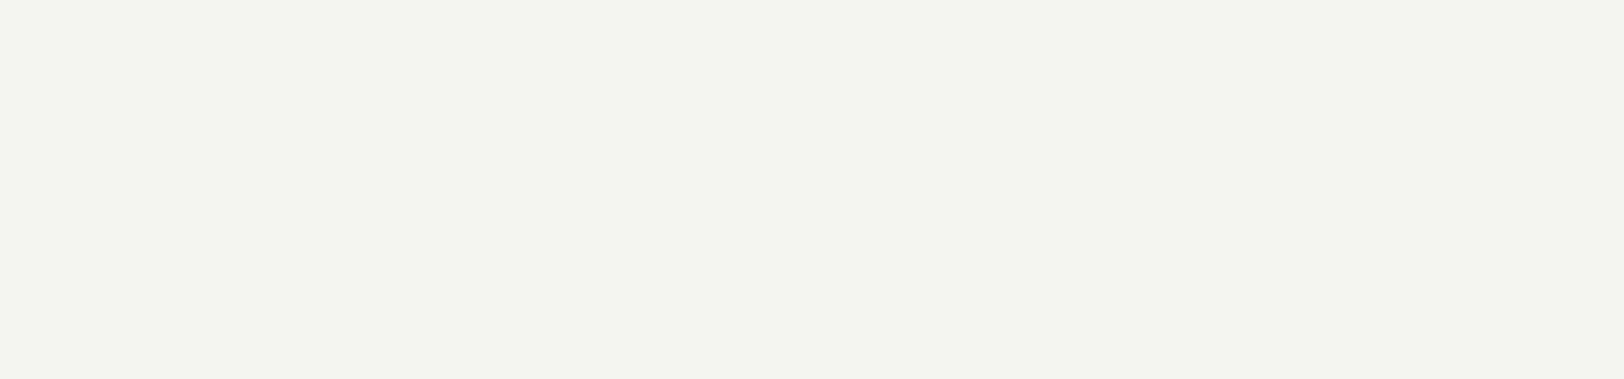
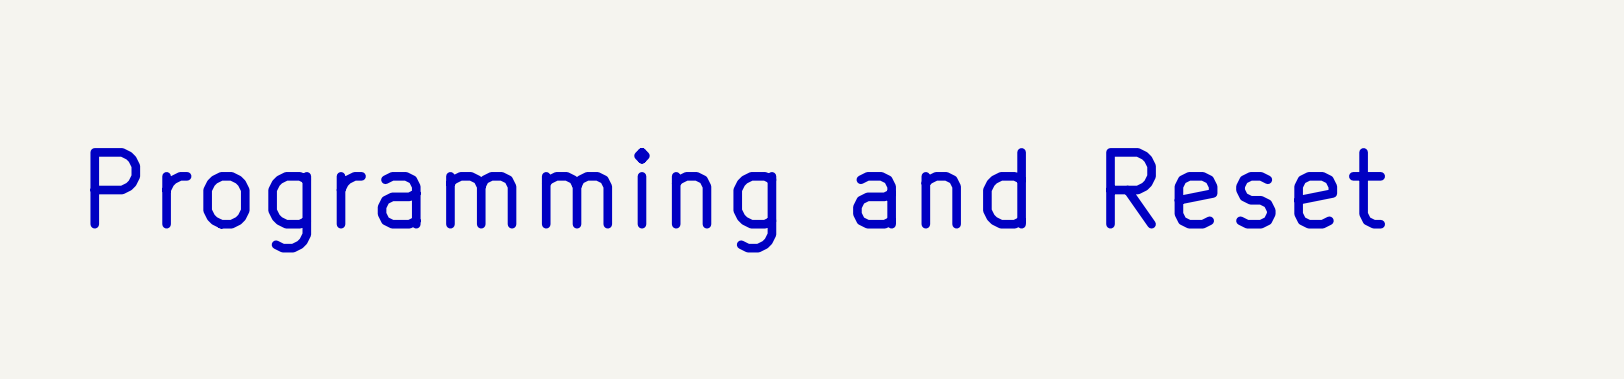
text: none -> Programming and Reset (737, 200)

